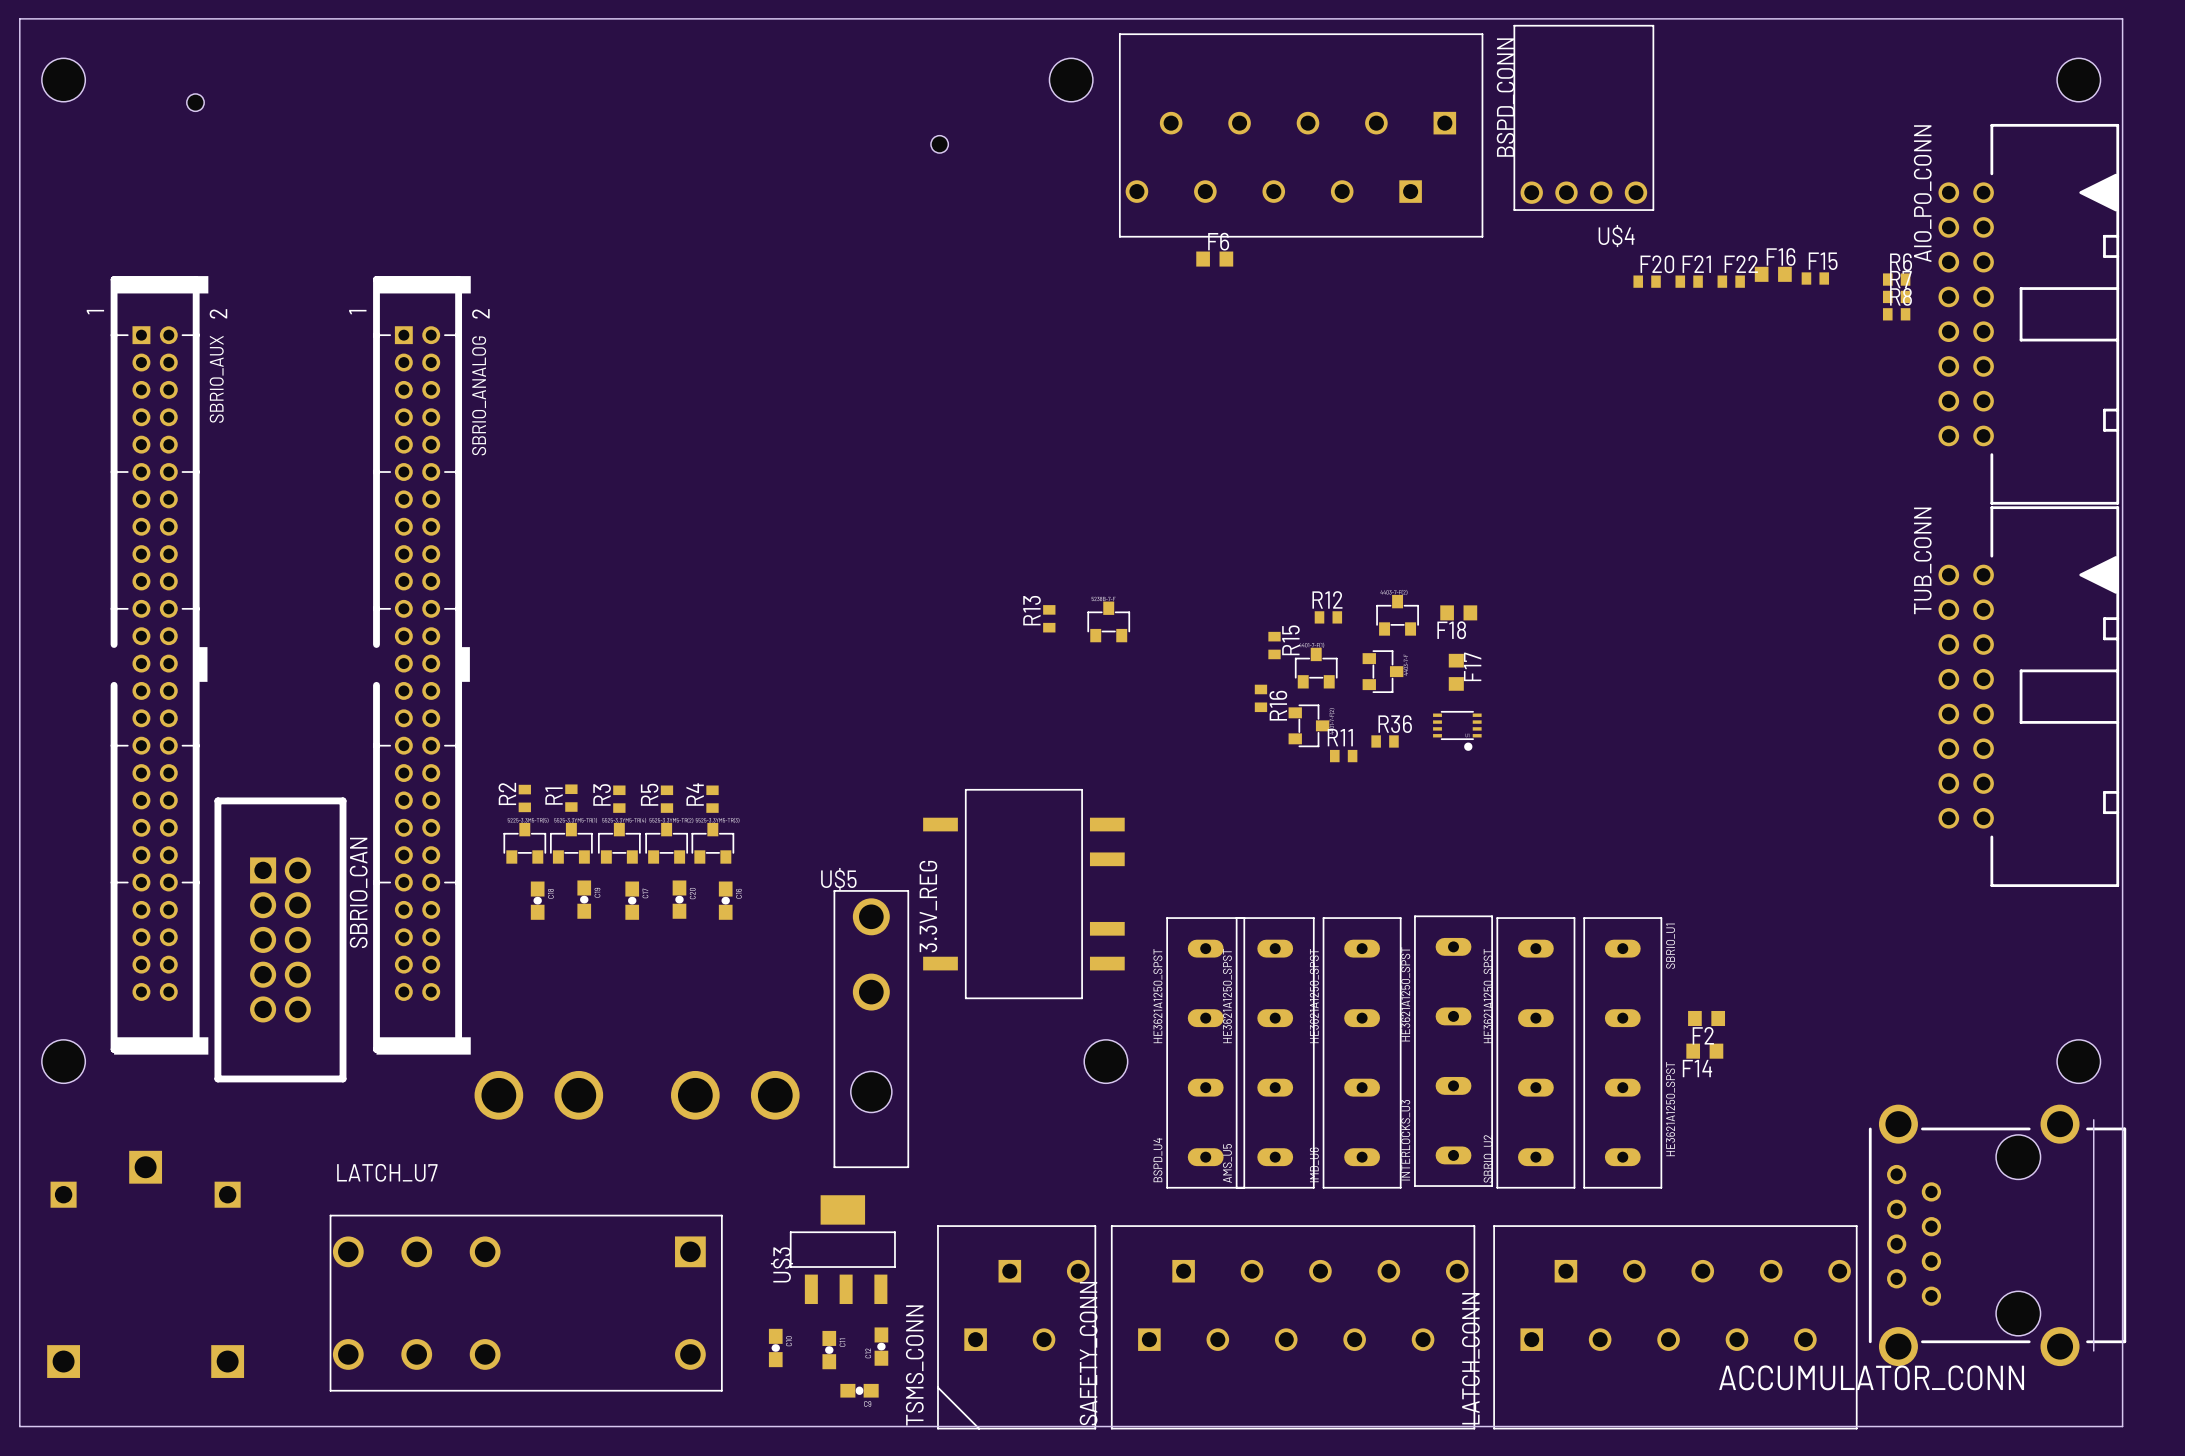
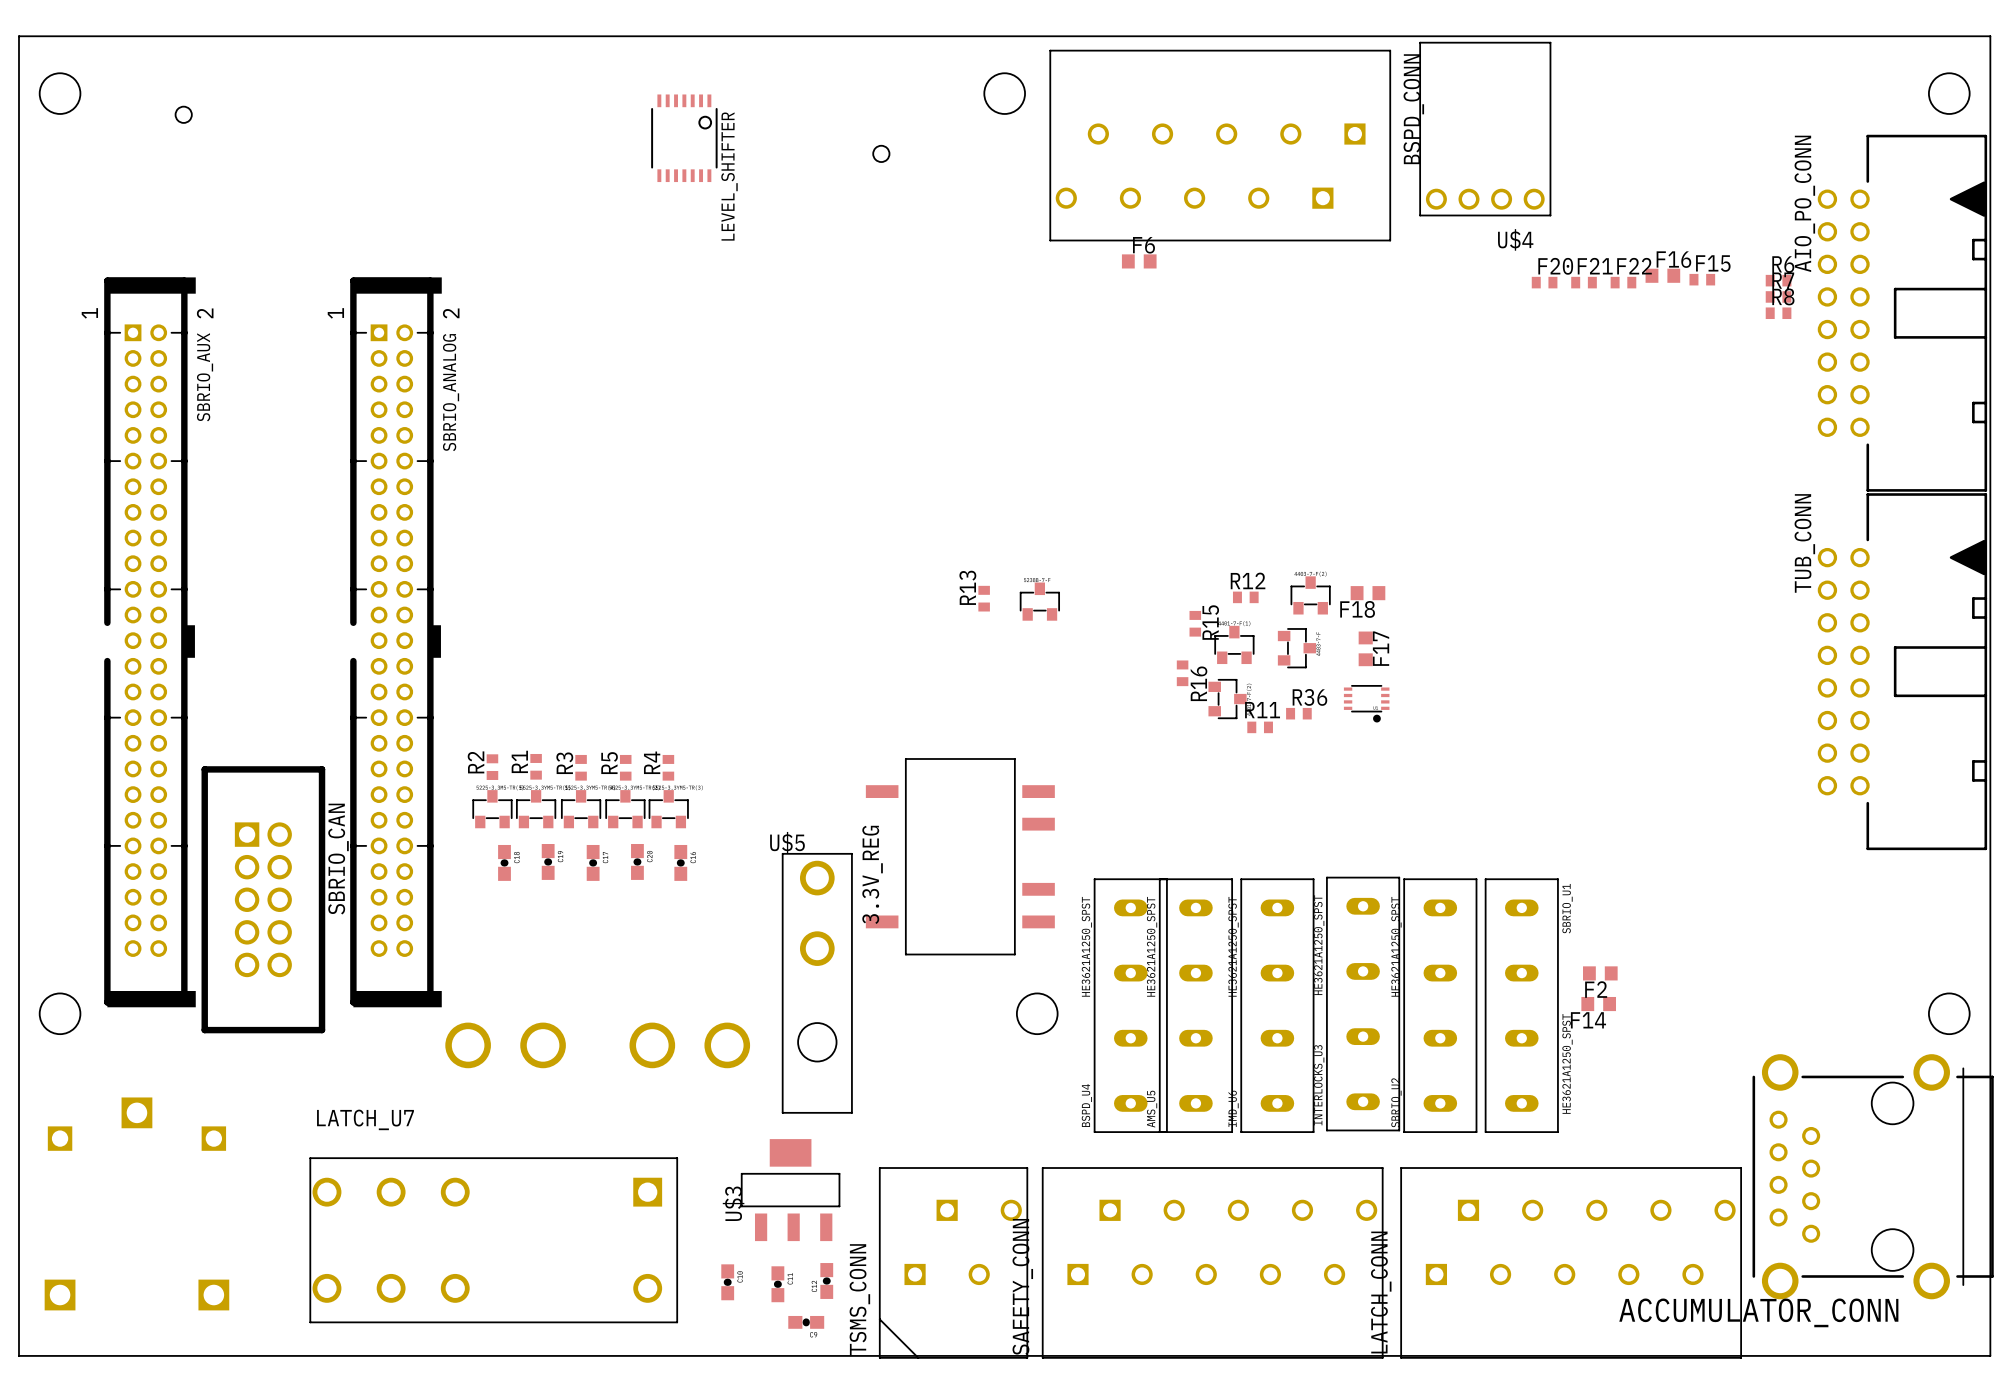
LEVEL_SHIFTER: none -> (684, 138)

